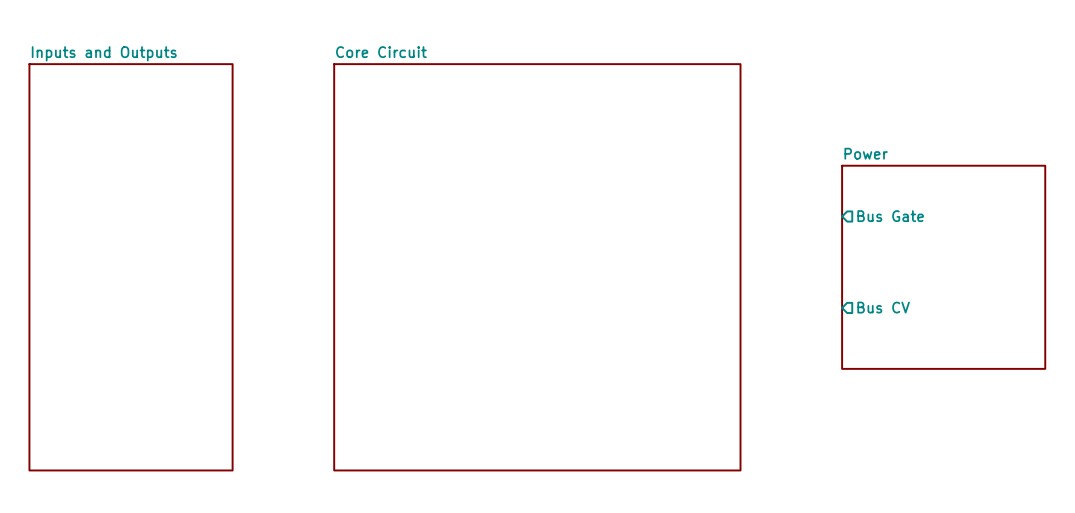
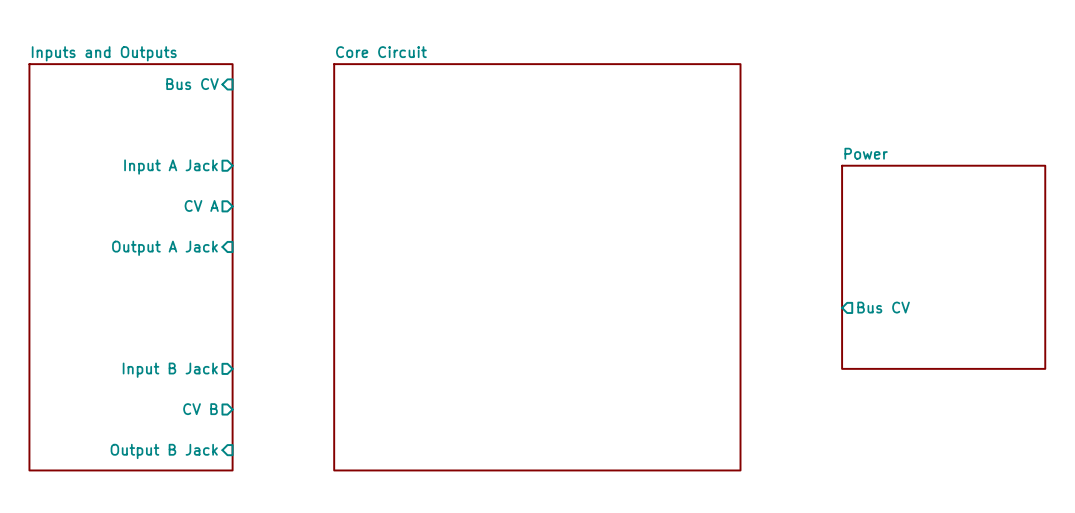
sheet pin: none -> Bus CV (192, 84)
sheet pin: none -> Input A Jack (171, 167)
sheet pin: none -> CV A (201, 205)
sheet pin: Bus Gate (890, 216) -> none
sheet pin: none -> Output A Jack (164, 248)
sheet pin: none -> Input B Jack (170, 370)
sheet pin: none -> CV B (200, 409)
sheet pin: none -> Output B Jack (164, 451)

